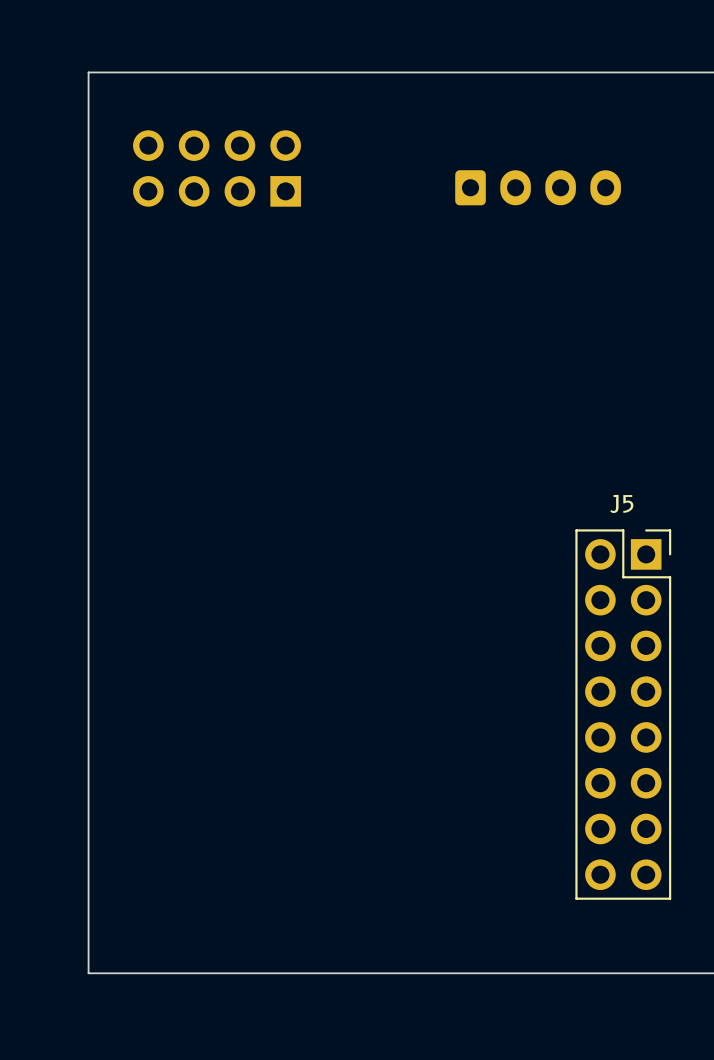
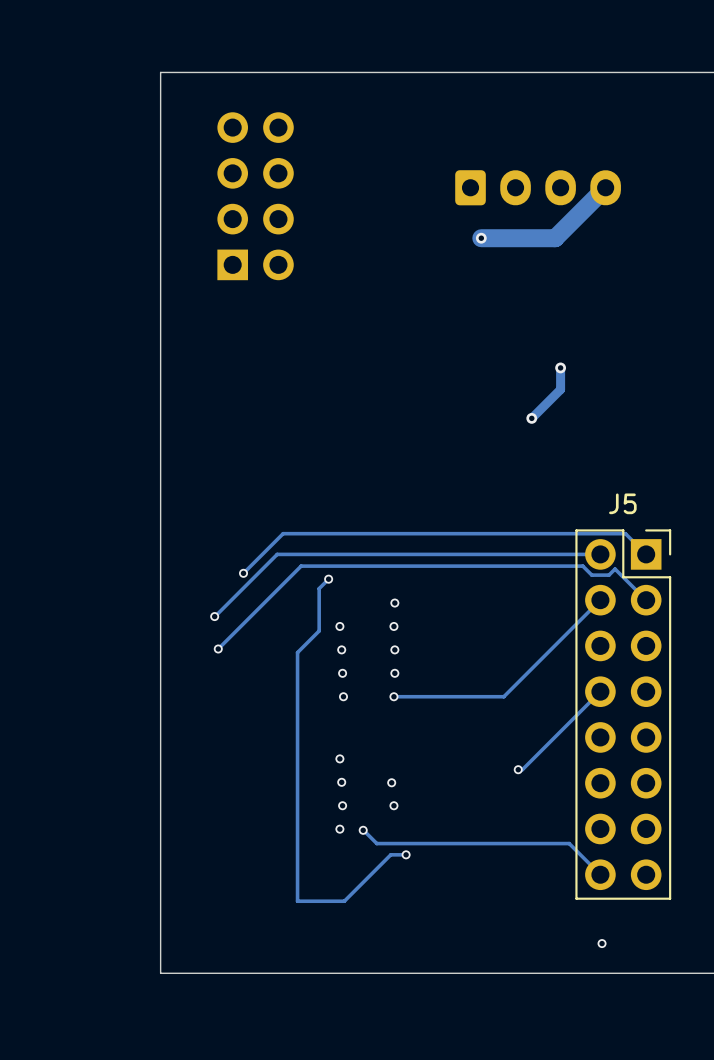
board edge: (160, 72) (88, 72) (88, 973) (160, 973) -> (160, 72) (160, 973)
part rotation: 0° (217, 168) -> 90° clockwise (255, 196)
track: none -> (605, 187) (555, 238) (481, 238)
via: none -> (481, 238)
track: none -> (560, 367) (560, 389) (531, 418)
via: none -> (560, 367)
via: none -> (531, 418)
track: none -> (600, 554) (277, 554) (214, 616)
track: none -> (646, 554) (625, 533) (283, 533) (243, 573)
via: none -> (243, 573)
track: none -> (328, 579) (319, 588) (319, 630) (297, 652) (297, 901) (344, 901) (390, 854) (406, 854)
via: none -> (328, 579)
track: none -> (600, 600) (503, 696) (393, 696)
track: none -> (646, 600) (615, 569) (609, 575) (591, 575) (582, 566) (301, 566) (218, 648)
via: none -> (394, 603)
via: none -> (214, 616)
via: none -> (339, 626)
via: none -> (393, 626)
via: none -> (218, 648)
via: none -> (341, 649)
via: none -> (394, 649)
via: none -> (342, 673)
via: none -> (394, 673)
track: none -> (600, 691) (522, 769) (518, 769)
via: none -> (343, 696)
via: none -> (393, 696)
via: none -> (339, 758)
via: none -> (518, 769)
via: none -> (341, 782)
via: none -> (391, 782)
via: none -> (342, 805)
via: none -> (393, 805)
via: none -> (339, 829)
track: none -> (362, 829) (376, 843) (569, 843) (600, 874)
via: none -> (363, 830)
via: none -> (406, 854)
via: none -> (602, 943)

